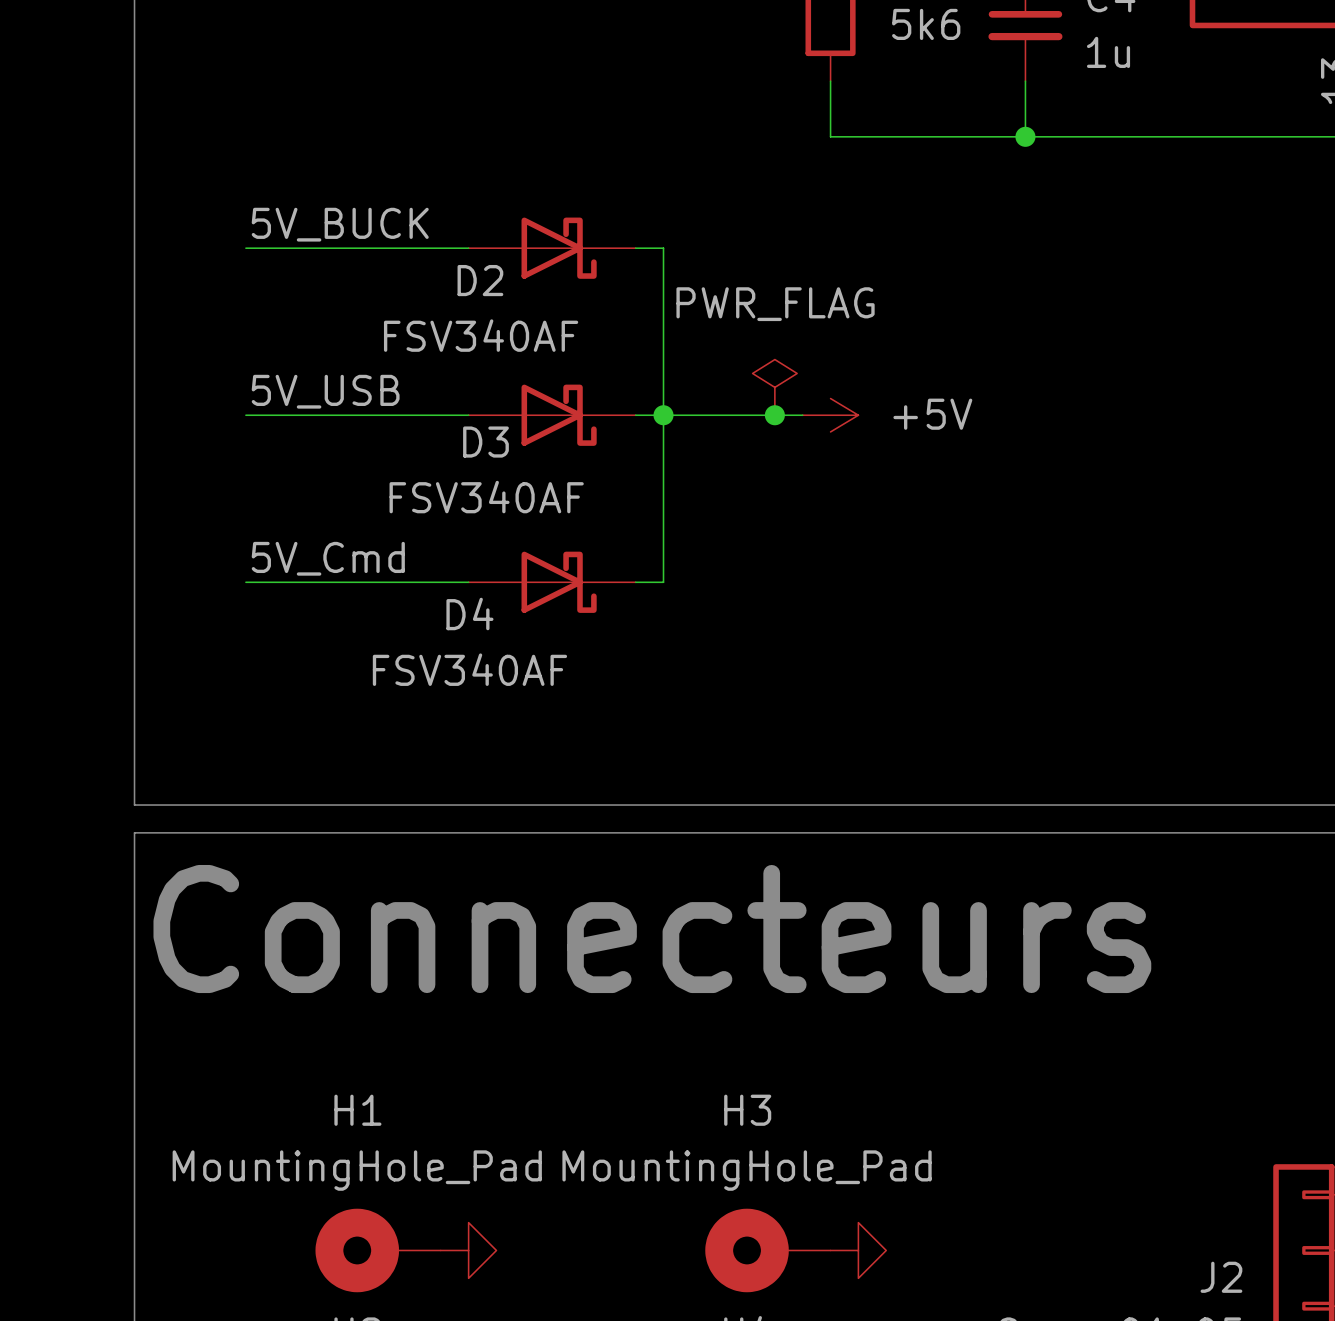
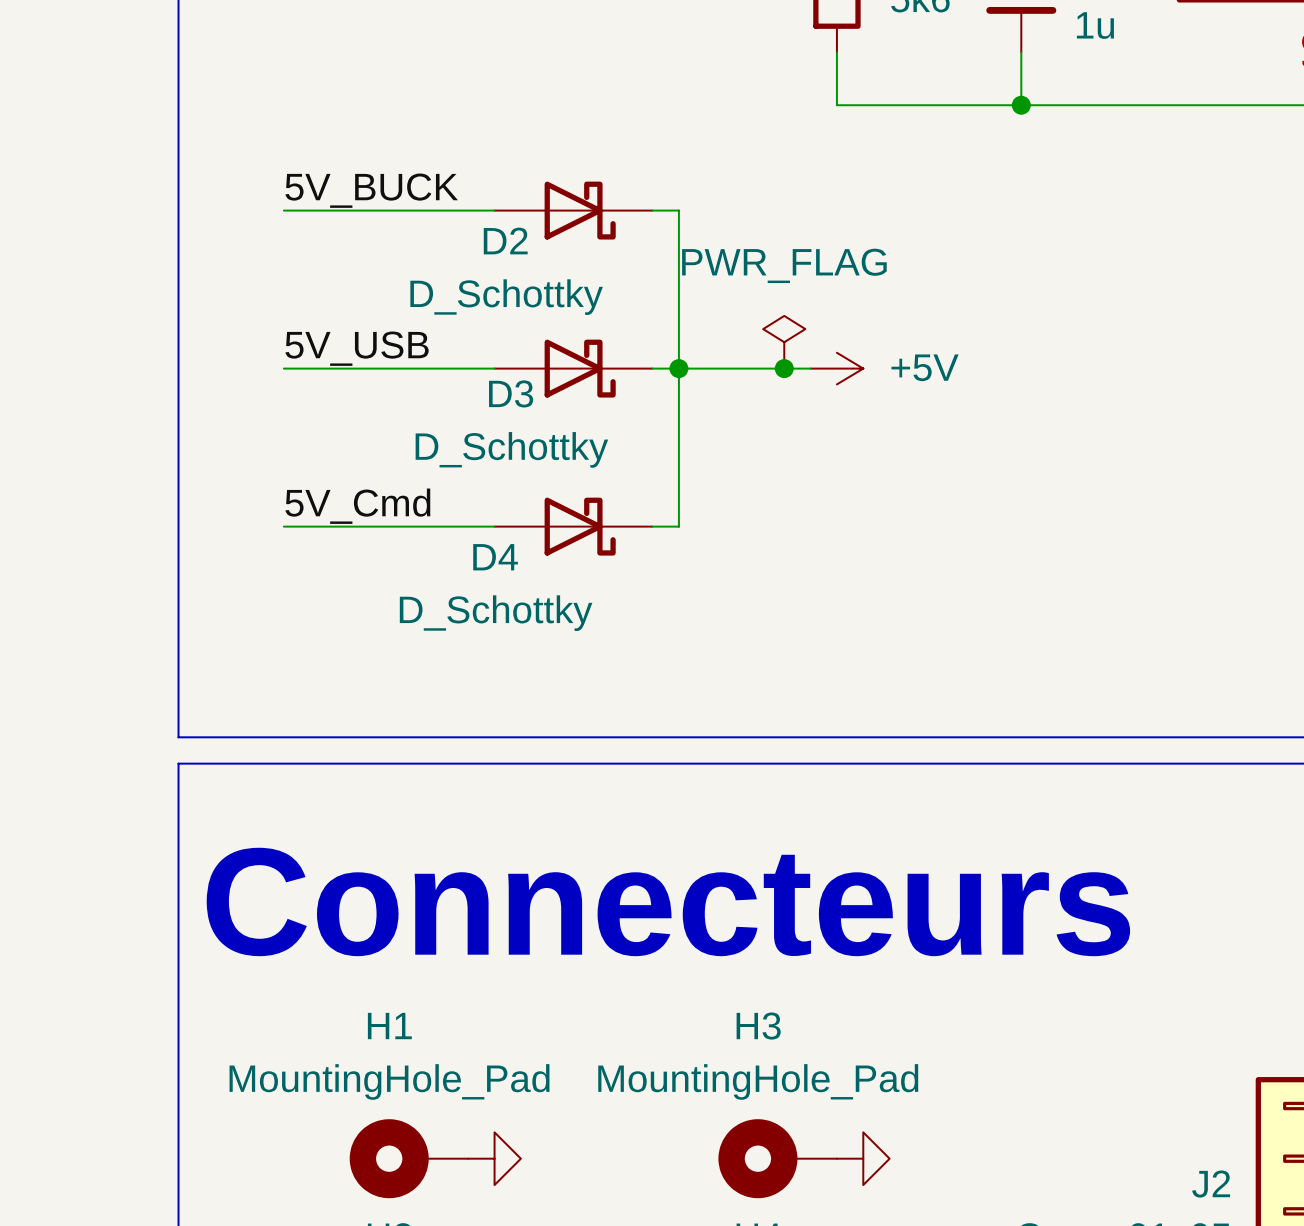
D2 value: FSV340AF (481, 335) -> D_Schottky (506, 297)
D3 value: FSV340AF (486, 497) -> D_Schottky (511, 449)
D4 value: FSV340AF (469, 669) -> D_Schottky (496, 613)
text position: Connecteurs (652, 929) -> Connecteurs (668, 901)

